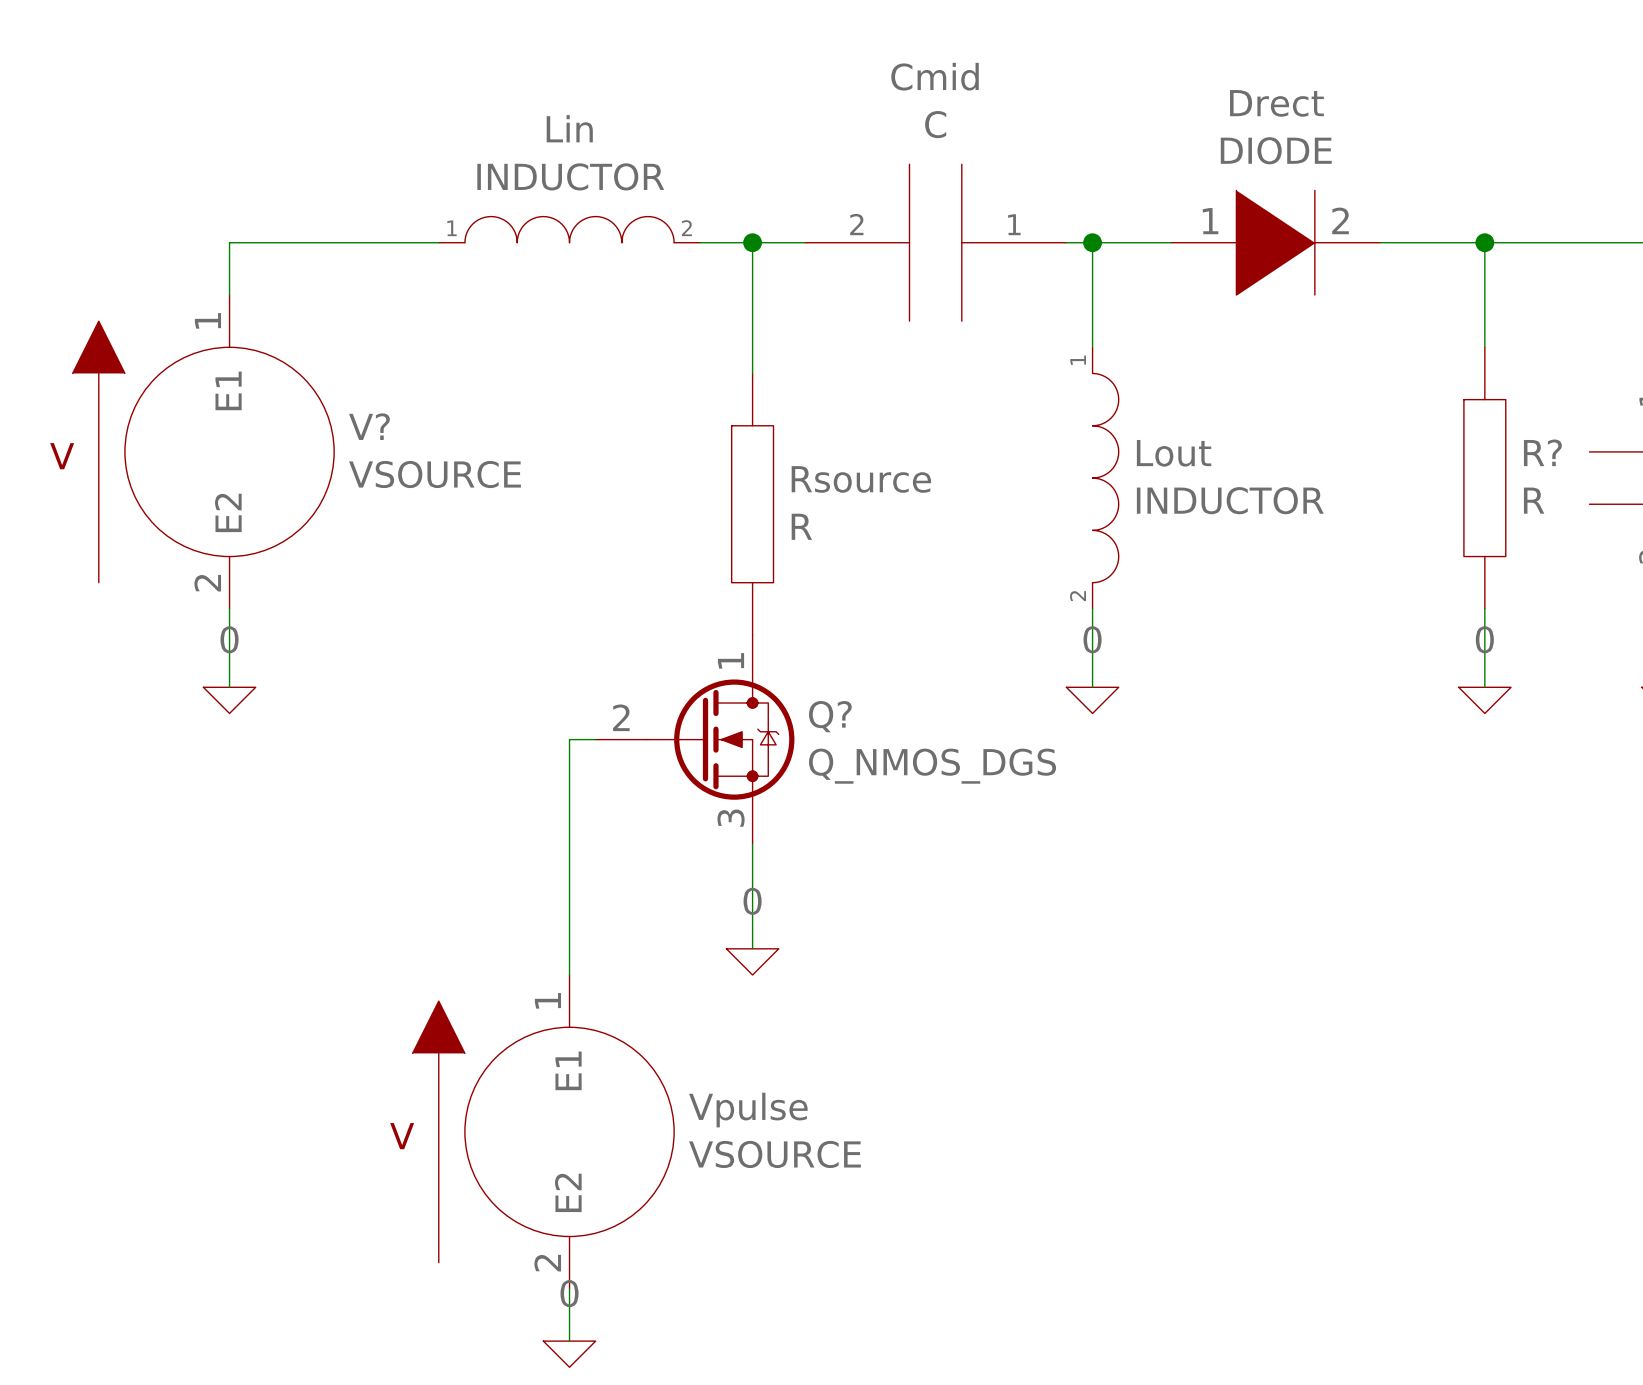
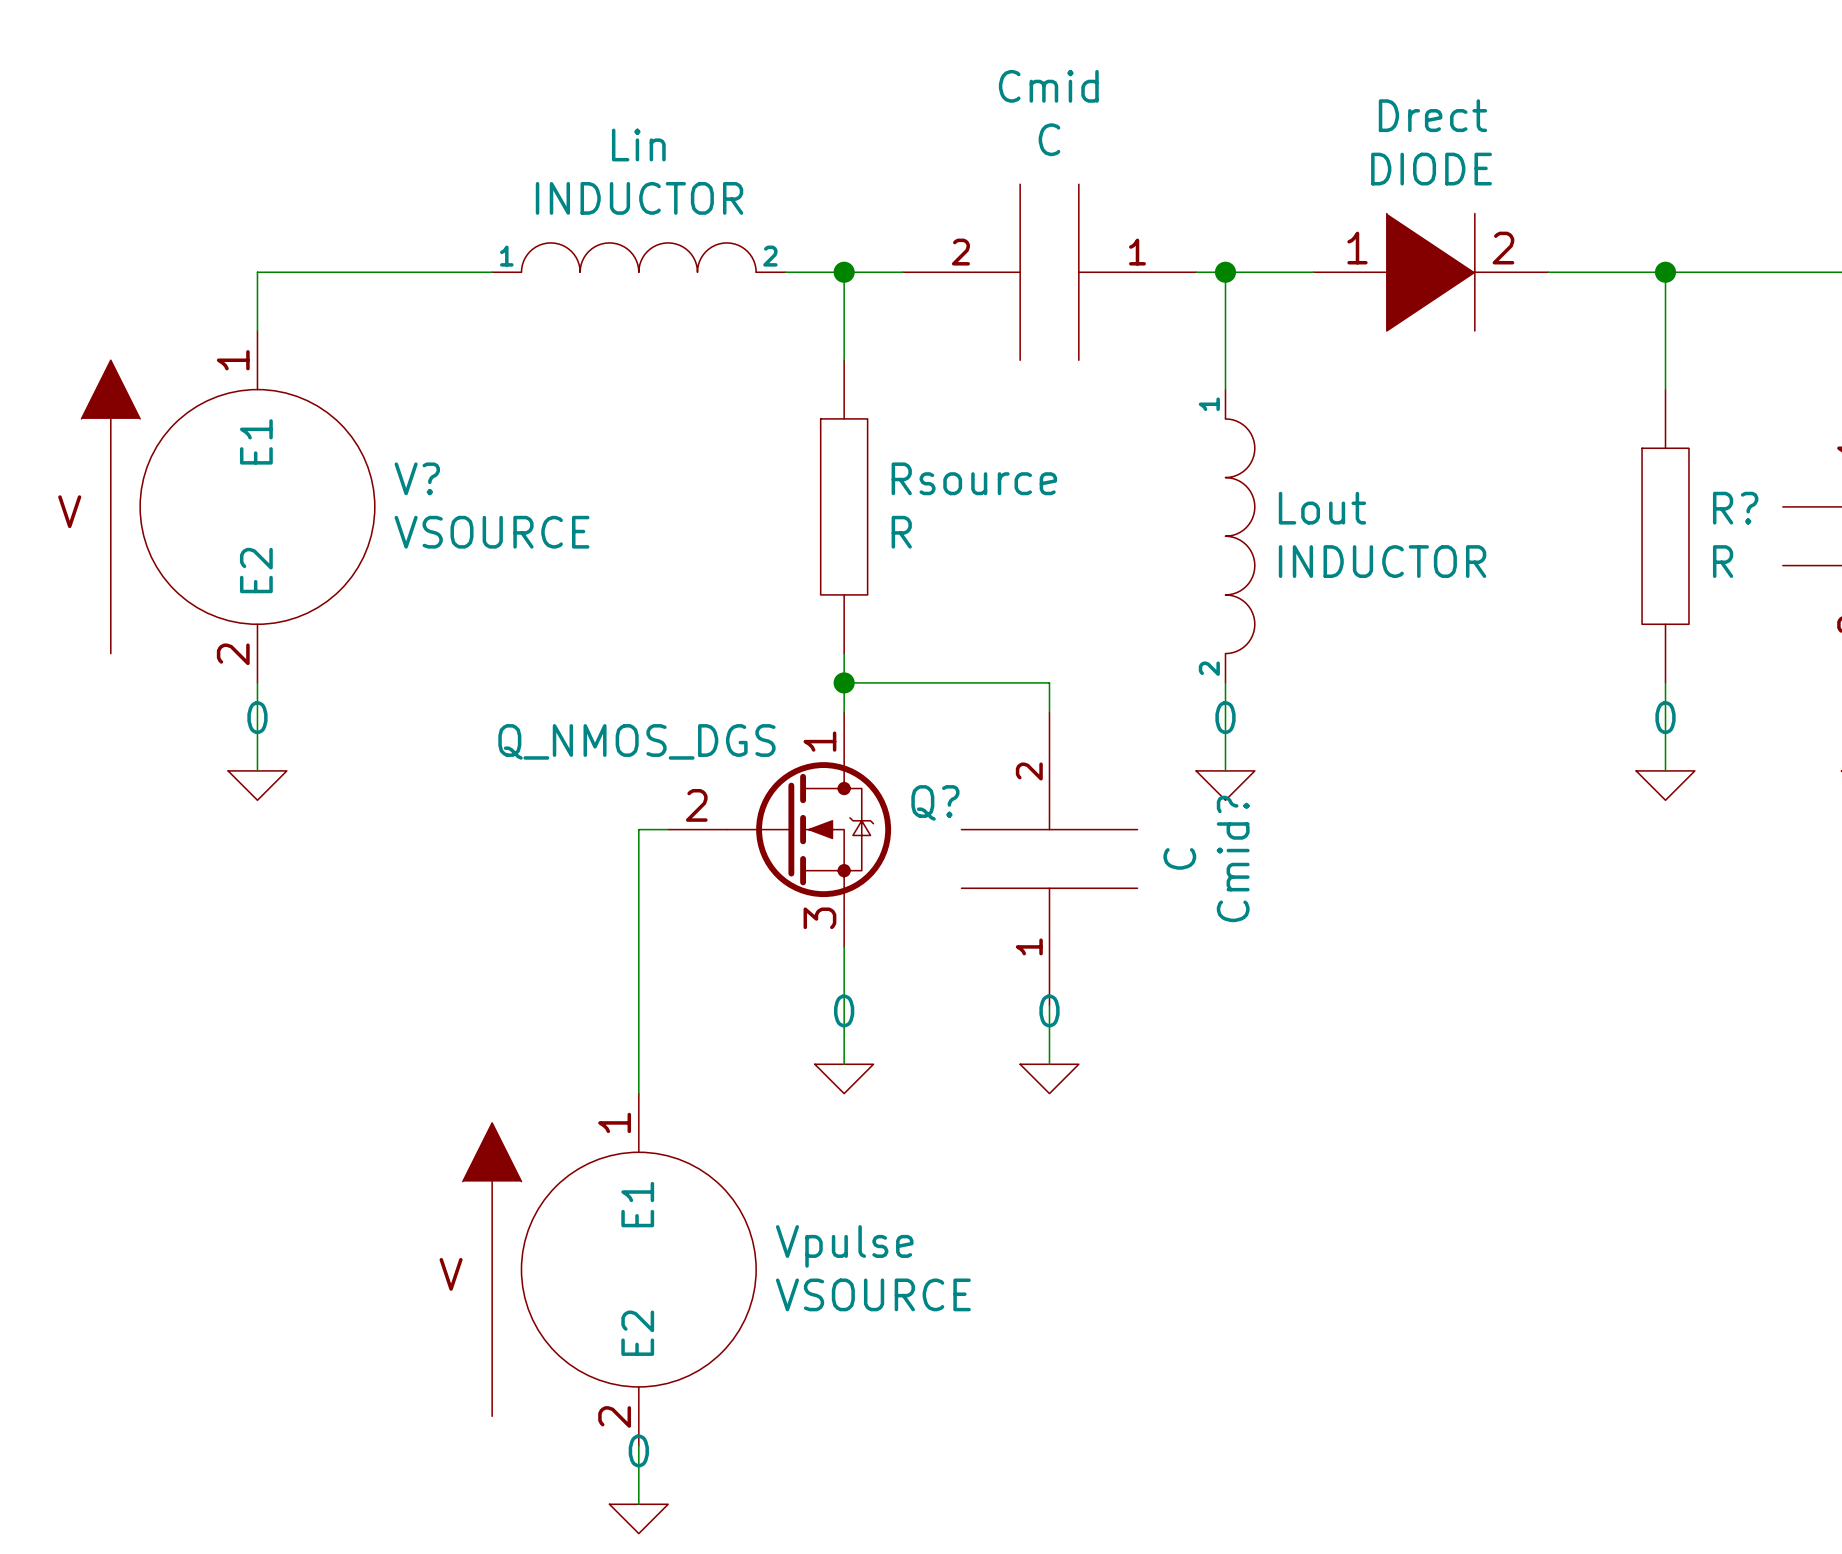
Rsource position: (752, 504) -> (844, 506)
wire: none -> (844, 682) (1049, 682) (1049, 712)
junction: none -> (844, 682)
Cmid?: none -> C (1049, 858)
Q? value position: Q_NMOS_DGS (932, 766) -> Q_NMOS_DGS (636, 741)
wire: none -> (1049, 1005) (1049, 1064)
power symbol: none -> 0 (1049, 1078)

